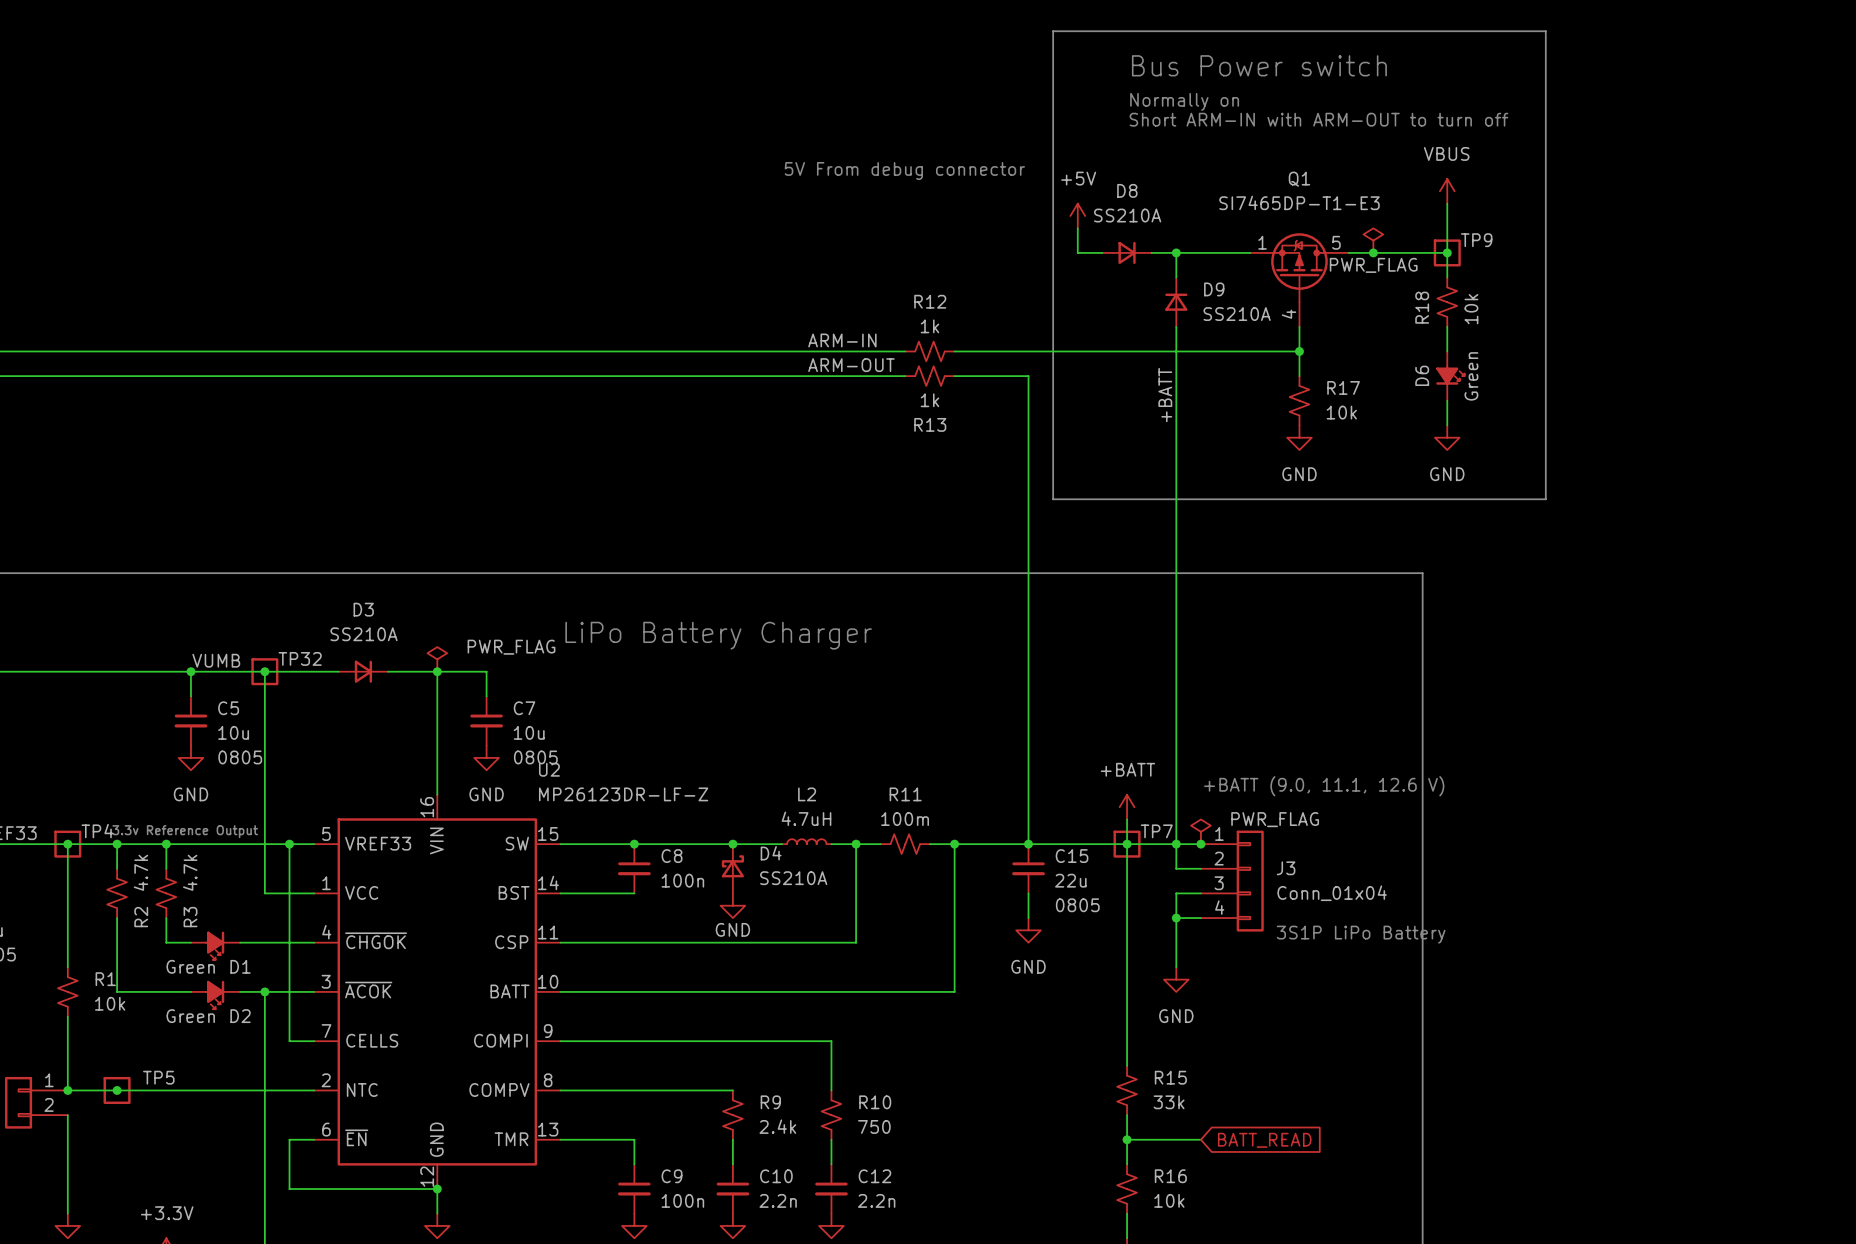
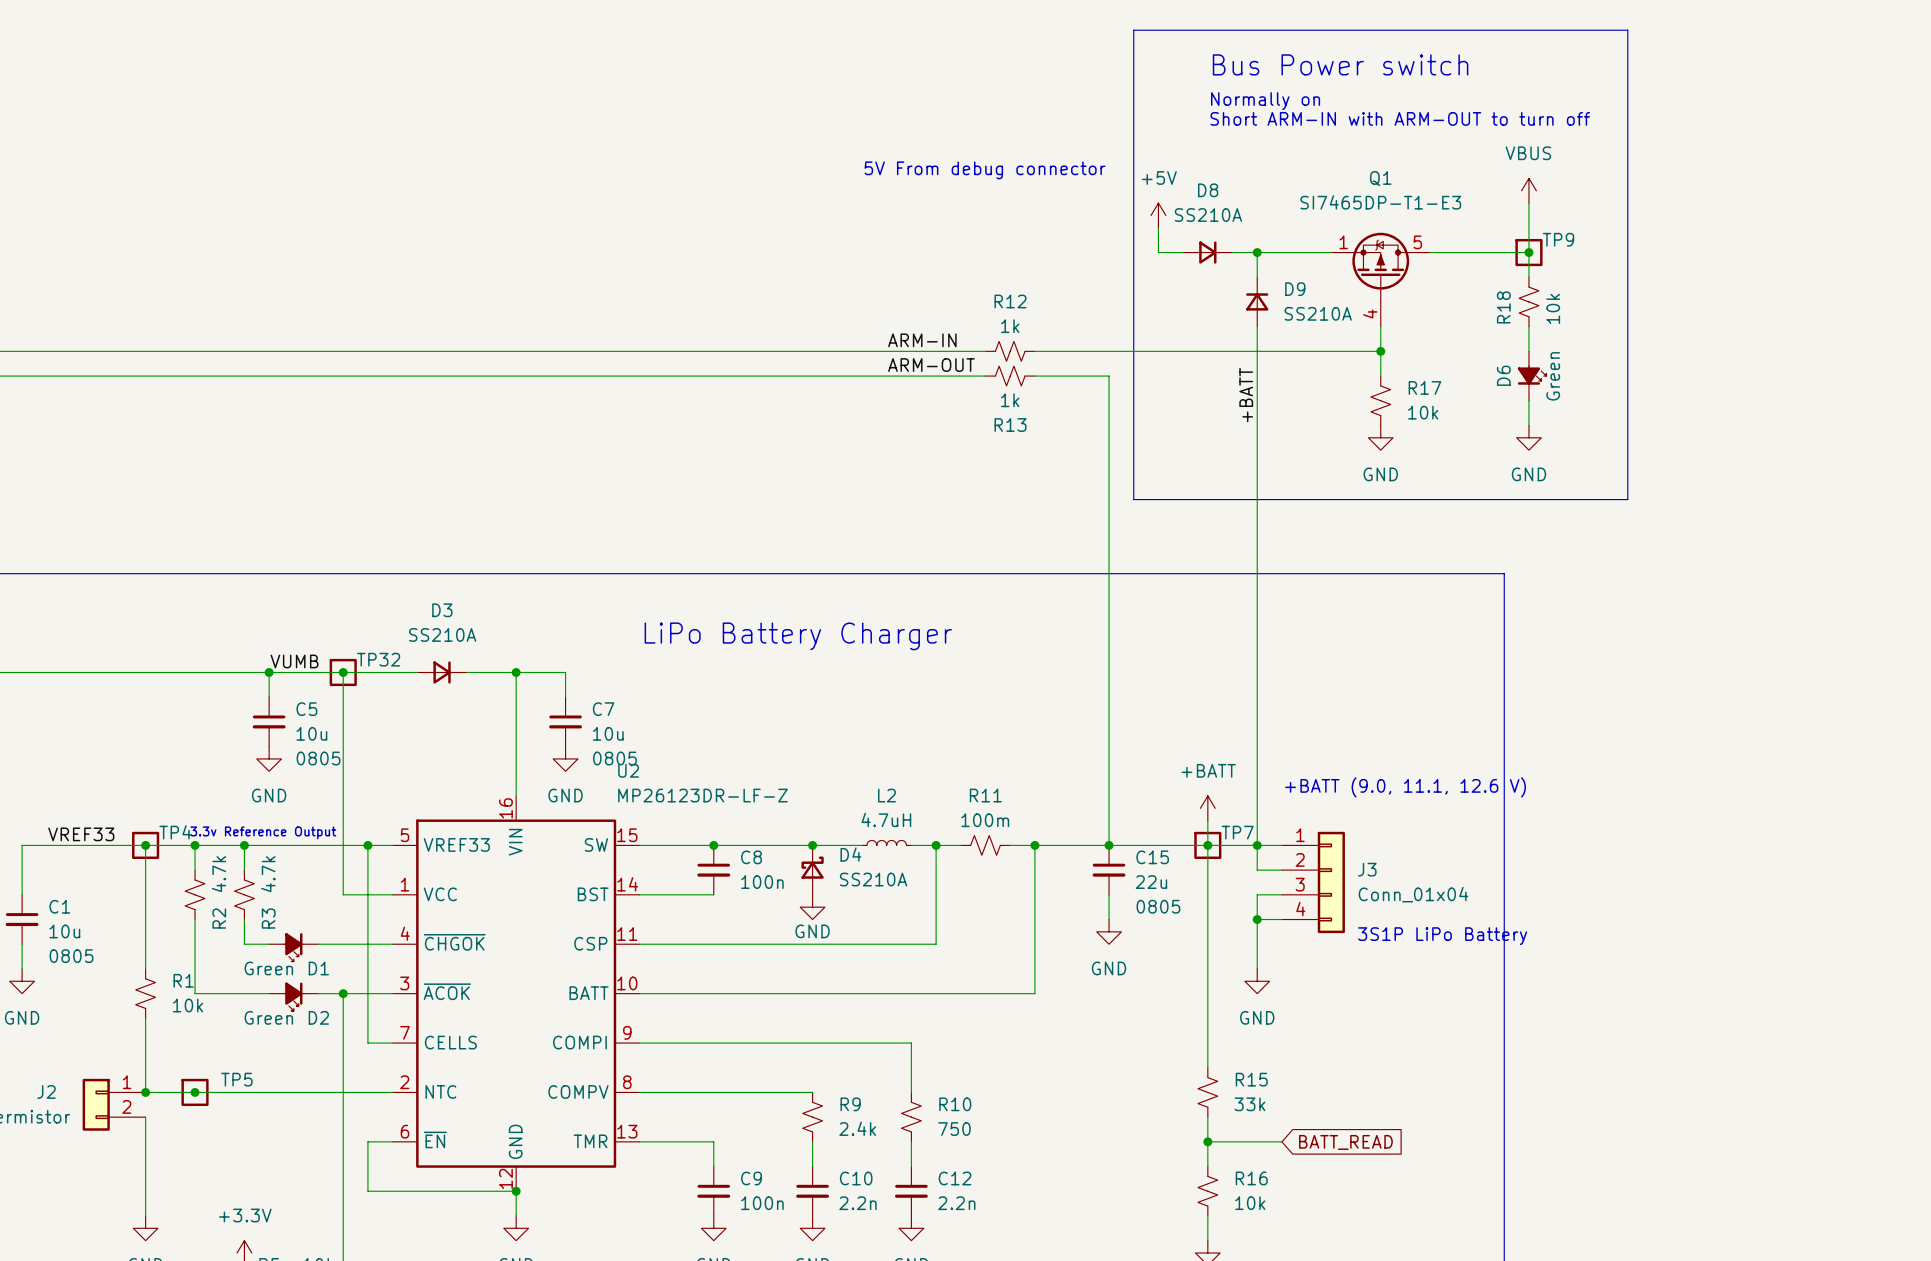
power symbol: PWR_FLAG (1373, 240) -> none
junction: (1373, 252) -> none
power symbol: PWR_FLAG (437, 659) -> none
power symbol: PWR_FLAG (1200, 831) -> none
junction: (1200, 844) -> none

